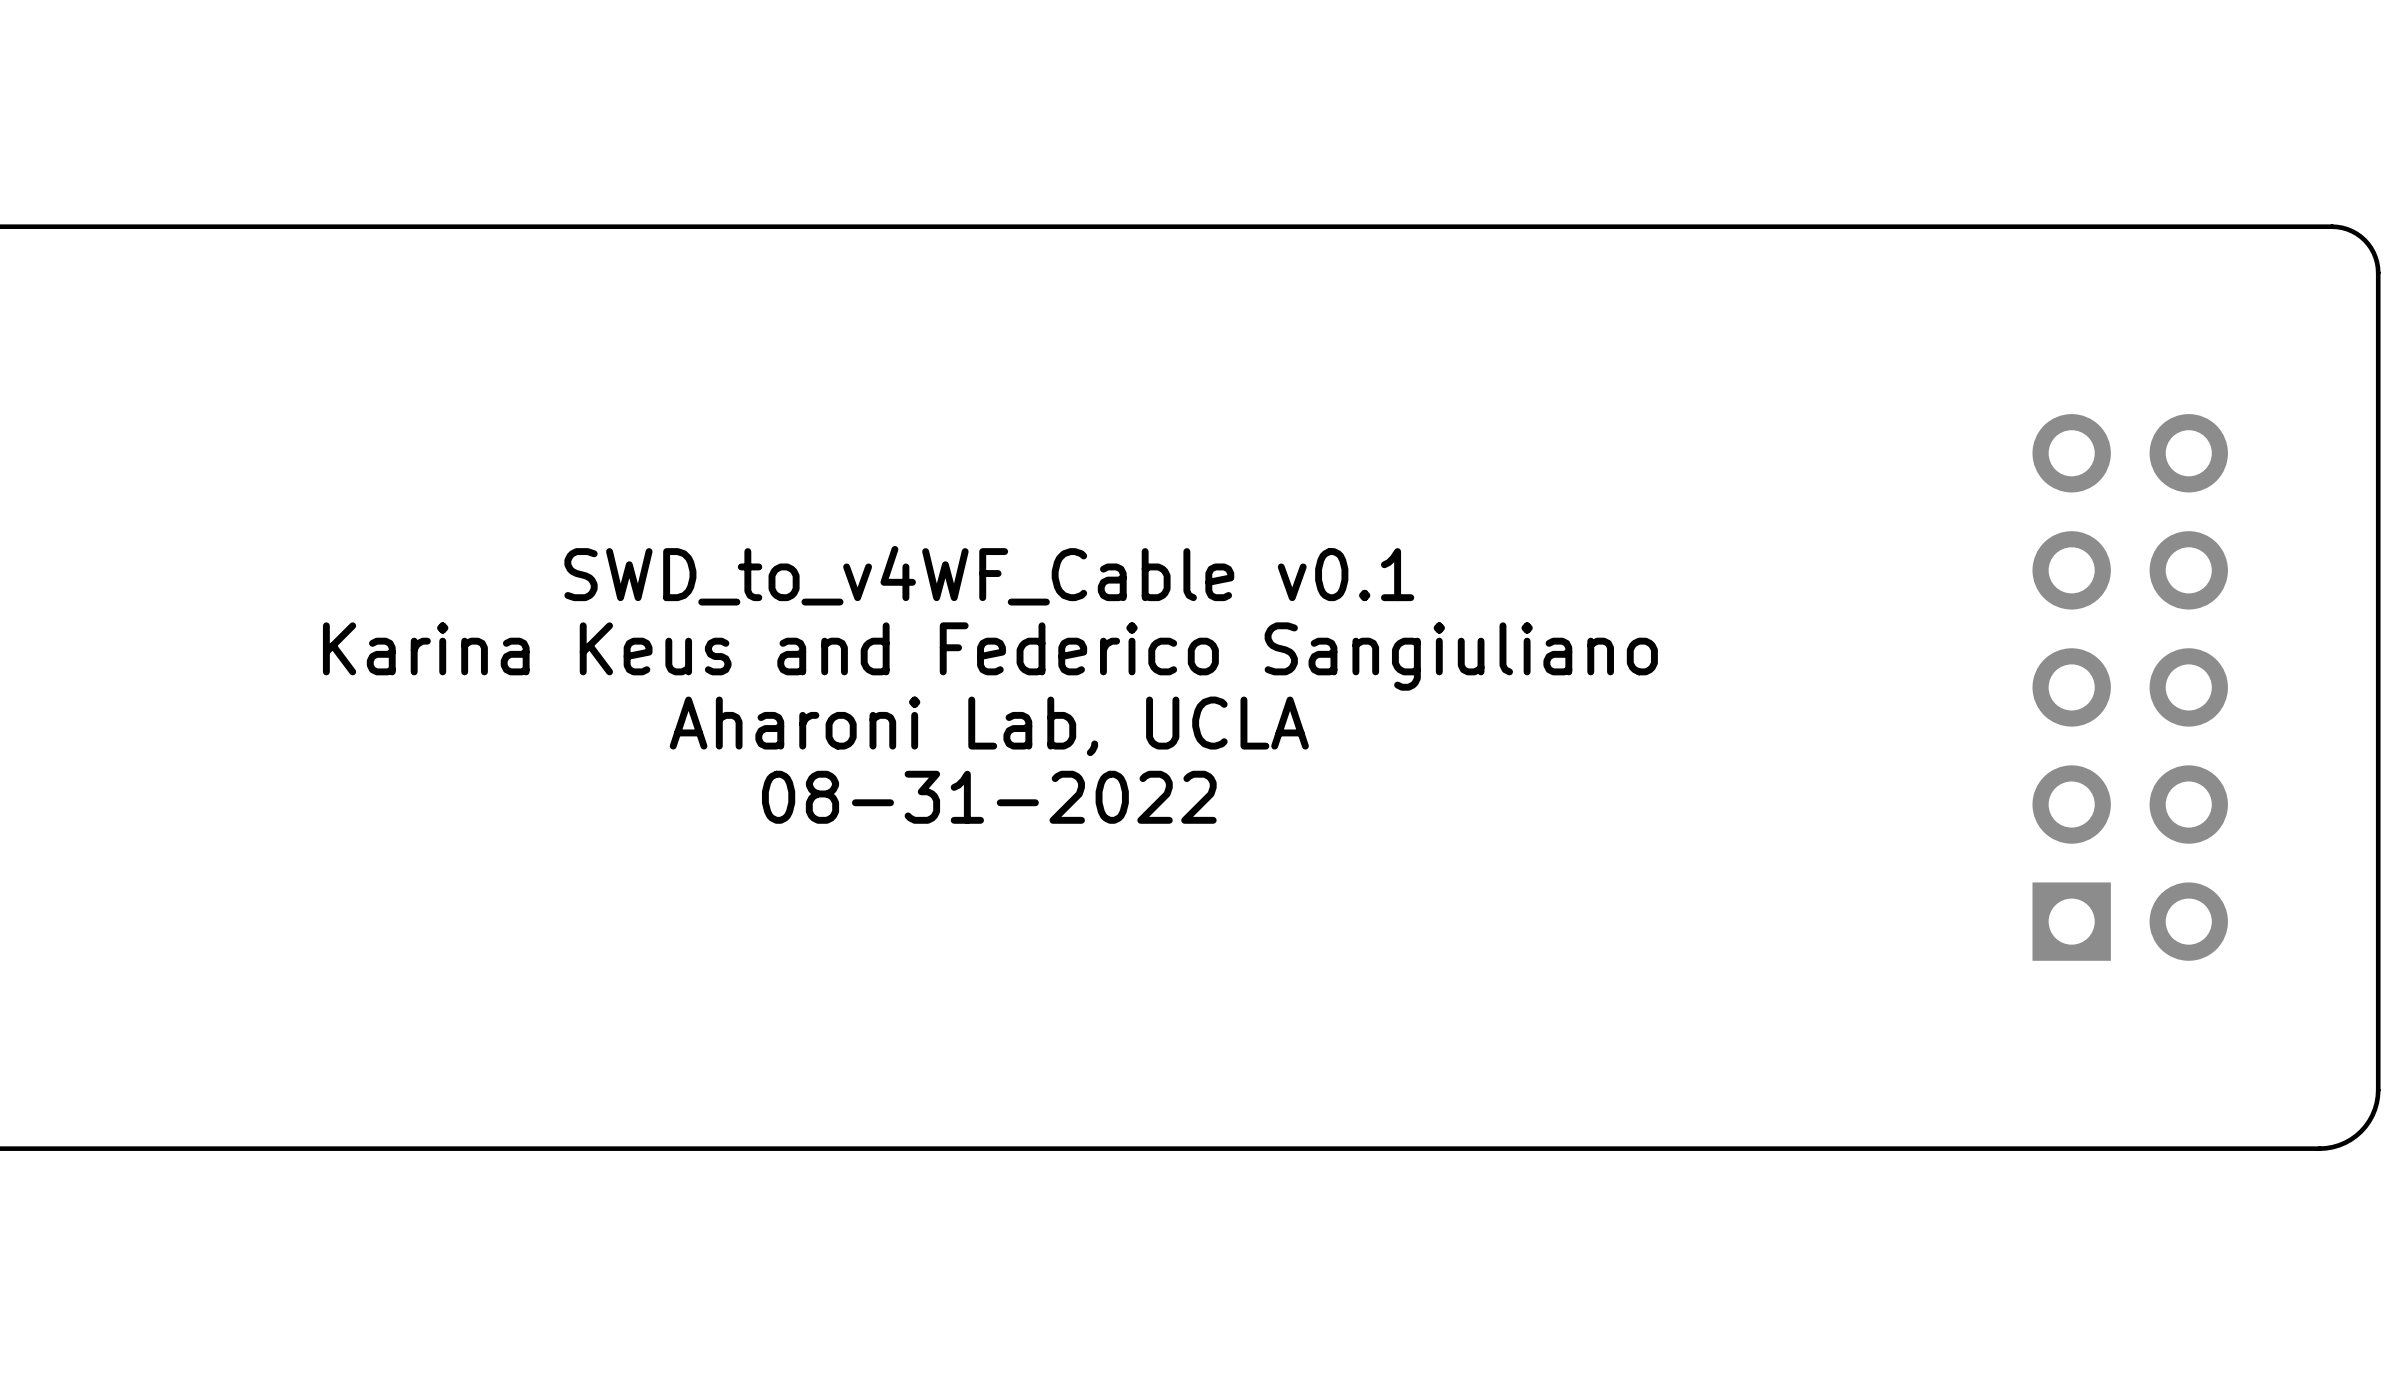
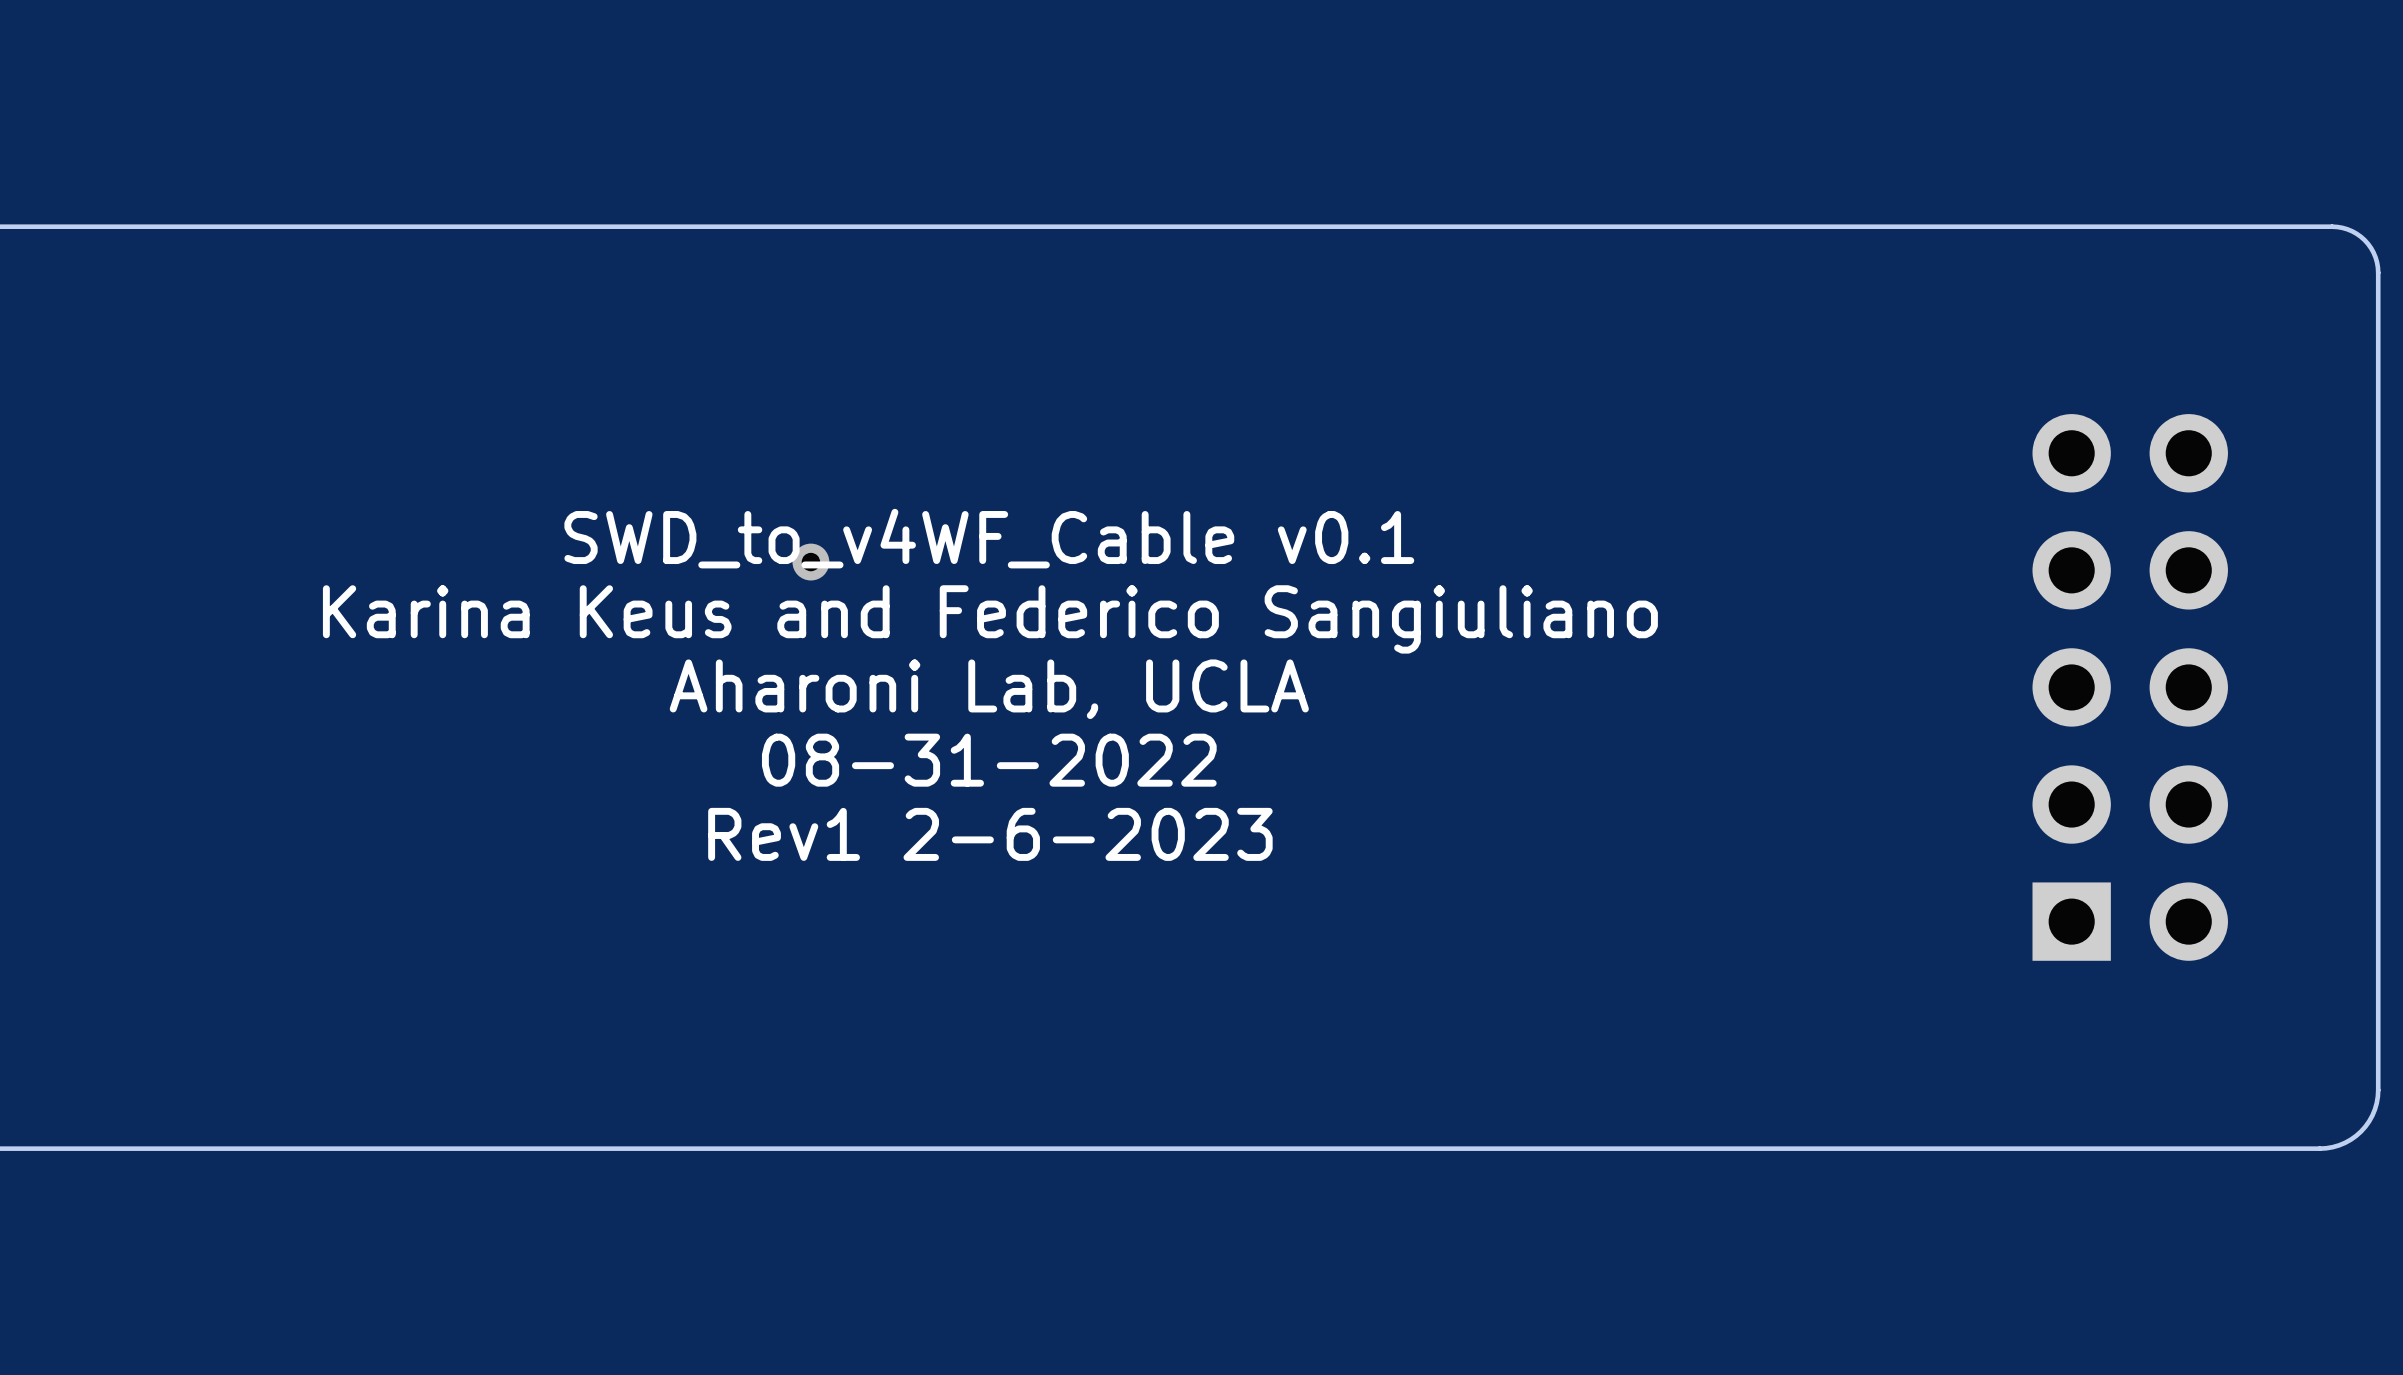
via: none -> (810, 562)
text position: SWD_to_v4WF_Cable v0.1 (989, 575) -> SWD_to_v4WF_Cable v0.1 (989, 538)
text position: Karina Keus and Federico Sangiuliano (990, 656) -> Karina Keus and Federico Sangiuliano (990, 619)
text position: Aharoni Lab, UCLA (989, 726) -> Aharoni Lab, UCLA (989, 689)
text position: 08-31-2022 (989, 797) -> 08-31-2022 (989, 760)
text: none -> Rev1 2-6-2023 (990, 834)

